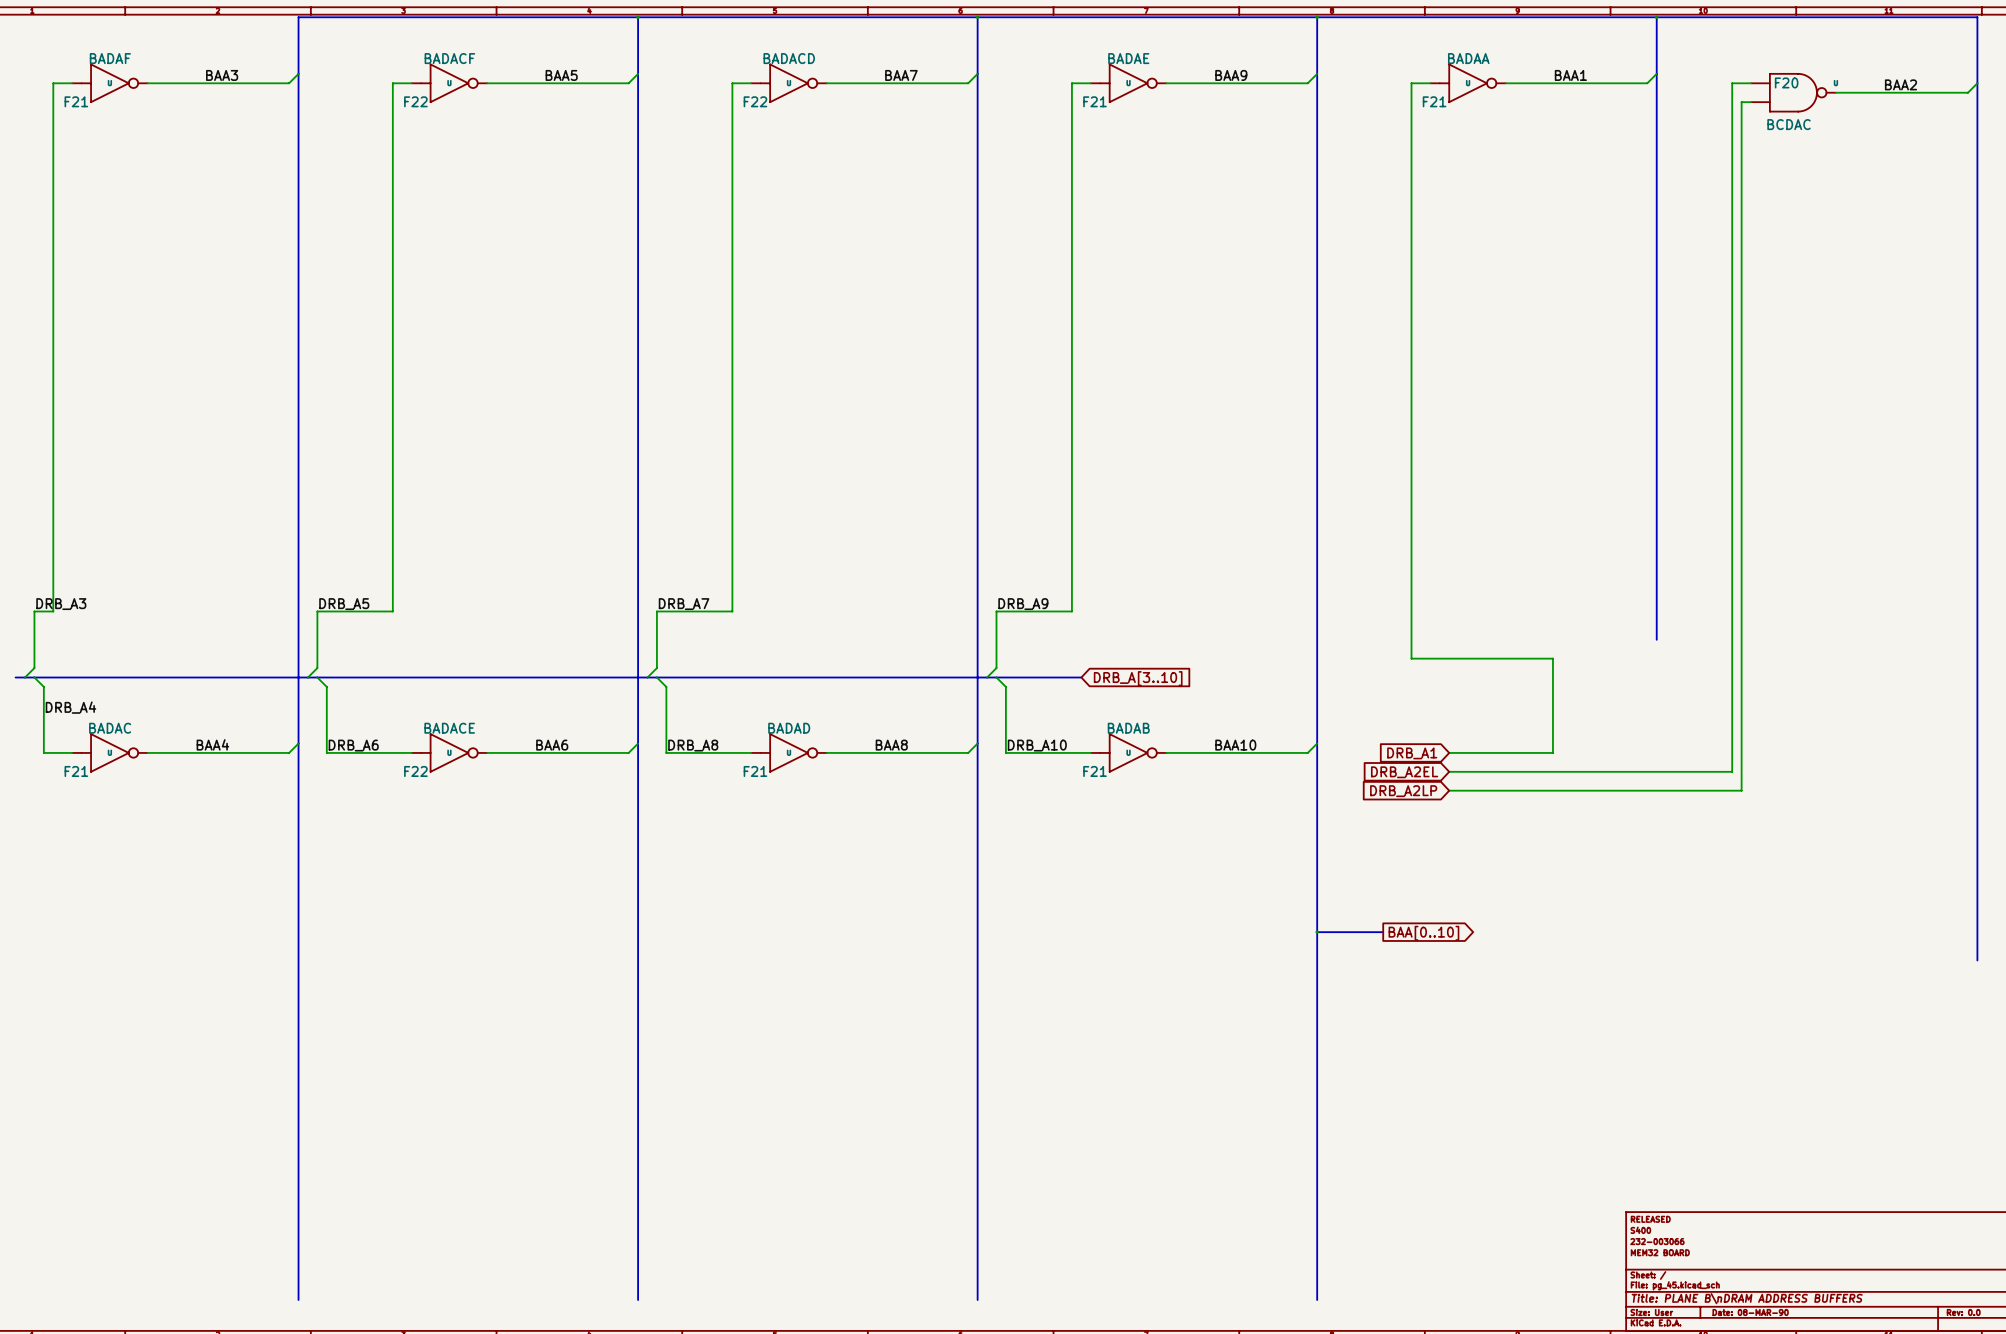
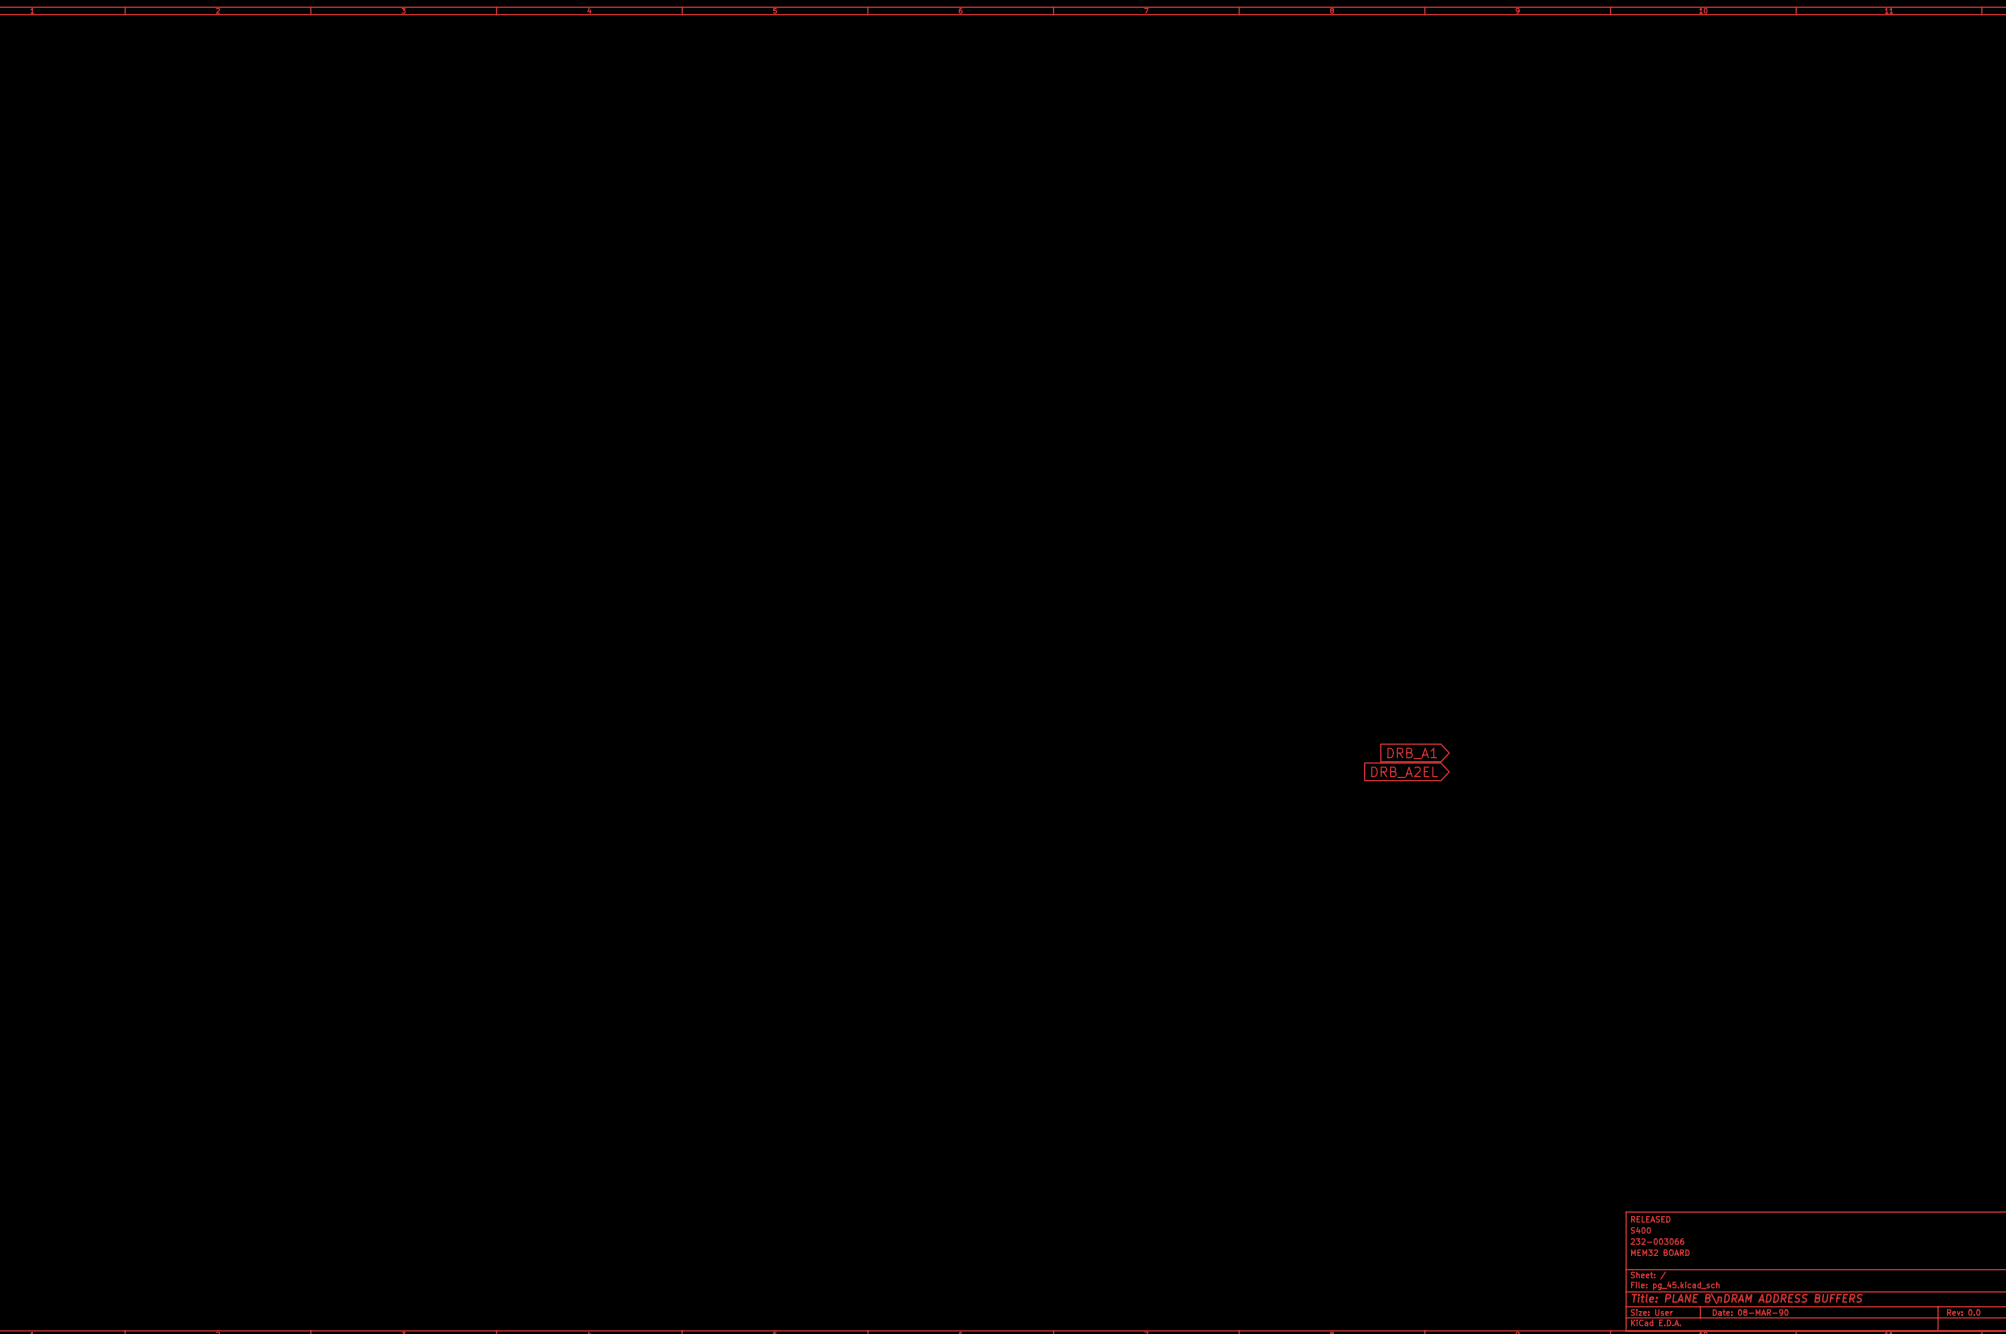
bus: (638, 17) (638, 1300) -> none
junction: (638, 17) -> none
bus: (977, 17) (977, 1300) -> none
junction: (977, 17) -> none
bus: (1317, 17) (1317, 1300) -> none
junction: (1317, 17) -> none
bus: (1656, 17) (1656, 639) -> none
junction: (1656, 17) -> none
wire: (298, 73) (289, 83) (147, 83) -> none
wire: (638, 73) (628, 83) (487, 83) -> none
wire: (977, 73) (968, 83) (826, 83) -> none
wire: (1317, 73) (1307, 83) (1166, 83) -> none
wire: (1656, 73) (1647, 83) (1505, 83) -> none
label: BAA3 (222, 75) -> none
label: BAA5 (561, 75) -> none
label: BAA7 (901, 75) -> none
label: BAA9 (1231, 75) -> none
label: BAA1 (1570, 75) -> none
wire: (72, 83) (53, 83) (53, 611) (34, 611) (34, 668) (25, 677) -> none
part: (109, 83) -> none
wire: (411, 83) (392, 83) (392, 611) (317, 611) (317, 668) (307, 677) -> none
part: (449, 83) -> none
wire: (751, 83) (732, 83) (732, 611) (656, 611) (656, 668) (647, 677) -> none
part: (788, 83) -> none
wire: (1090, 83) (1071, 83) (1071, 611) (996, 611) (996, 668) (987, 677) -> none
part: (1128, 83) -> none
wire: (1430, 83) (1411, 83) (1411, 658) (1552, 658) (1552, 752) (1449, 752) -> none
part: (1468, 83) -> none
wire: (1751, 83) (1732, 83) (1732, 771) (1449, 771) -> none
wire: (1977, 83) (1967, 92) (1835, 92) -> none
label: BAA2 (1900, 84) -> none
part: (1793, 92) -> none
wire: (1751, 102) (1741, 102) (1741, 790) (1449, 790) -> none
label: DRB_A3 (61, 604) -> none
label: DRB_A5 (344, 604) -> none
label: DRB_A7 (684, 604) -> none
label: DRB_A9 (1023, 604) -> none
bus: (15, 677) (1081, 677) -> none
wire: (34, 677) (43, 686) (43, 752) (72, 752) -> none
wire: (317, 677) (326, 686) (326, 752) (411, 752) -> none
wire: (656, 677) (666, 686) (666, 752) (751, 752) -> none
wire: (996, 677) (1005, 686) (1005, 752) (1090, 752) -> none
global label: DRB_A[3..10] (1138, 678) -> none
label: DRB_A4 (70, 707) -> none
wire: (298, 743) (289, 752) (147, 752) -> none
wire: (638, 743) (628, 752) (487, 752) -> none
wire: (977, 743) (968, 752) (826, 752) -> none
wire: (1317, 743) (1307, 752) (1166, 752) -> none
label: BAA4 (212, 744) -> none
label: DRB_A6 (353, 745) -> none
label: BAA6 (552, 745) -> none
label: DRB_A8 (693, 745) -> none
label: BAA8 (891, 745) -> none
label: DRB_A10 (1037, 745) -> none
label: BAA10 (1235, 745) -> none
part: (109, 752) -> none
part: (449, 752) -> none
part: (788, 752) -> none
part: (1128, 752) -> none
global label: DRB_A2LP (1403, 791) -> none
bus: (1317, 932) (1383, 932) -> none
junction: (1317, 932) -> none
global label: BAA[0..10] (1423, 933) -> none
bus: (1977, 960) (1977, 17) (298, 17) (298, 1300) -> none

